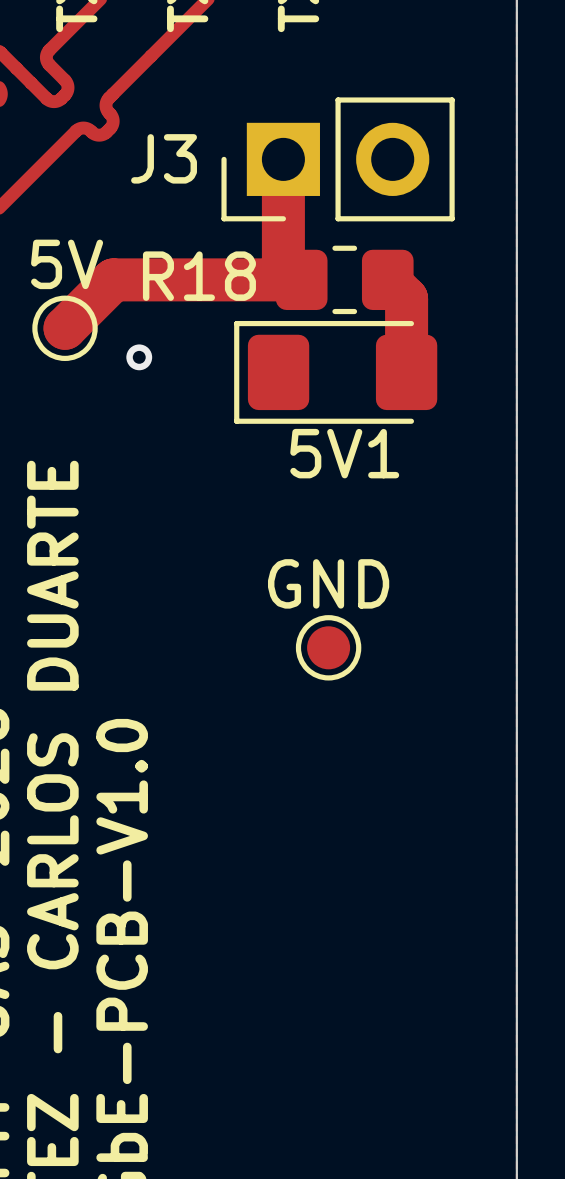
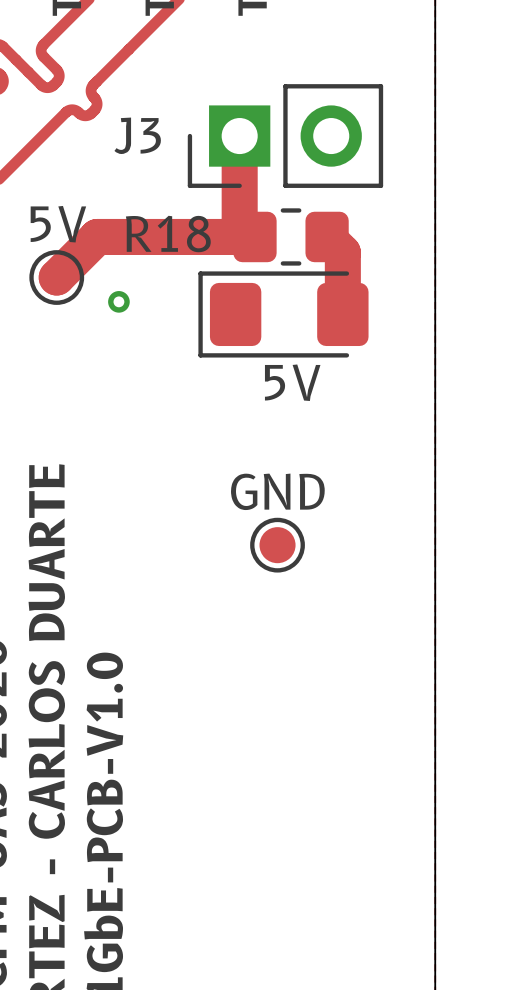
5V1 name: 5V1 (344, 453) -> 5V (292, 382)

